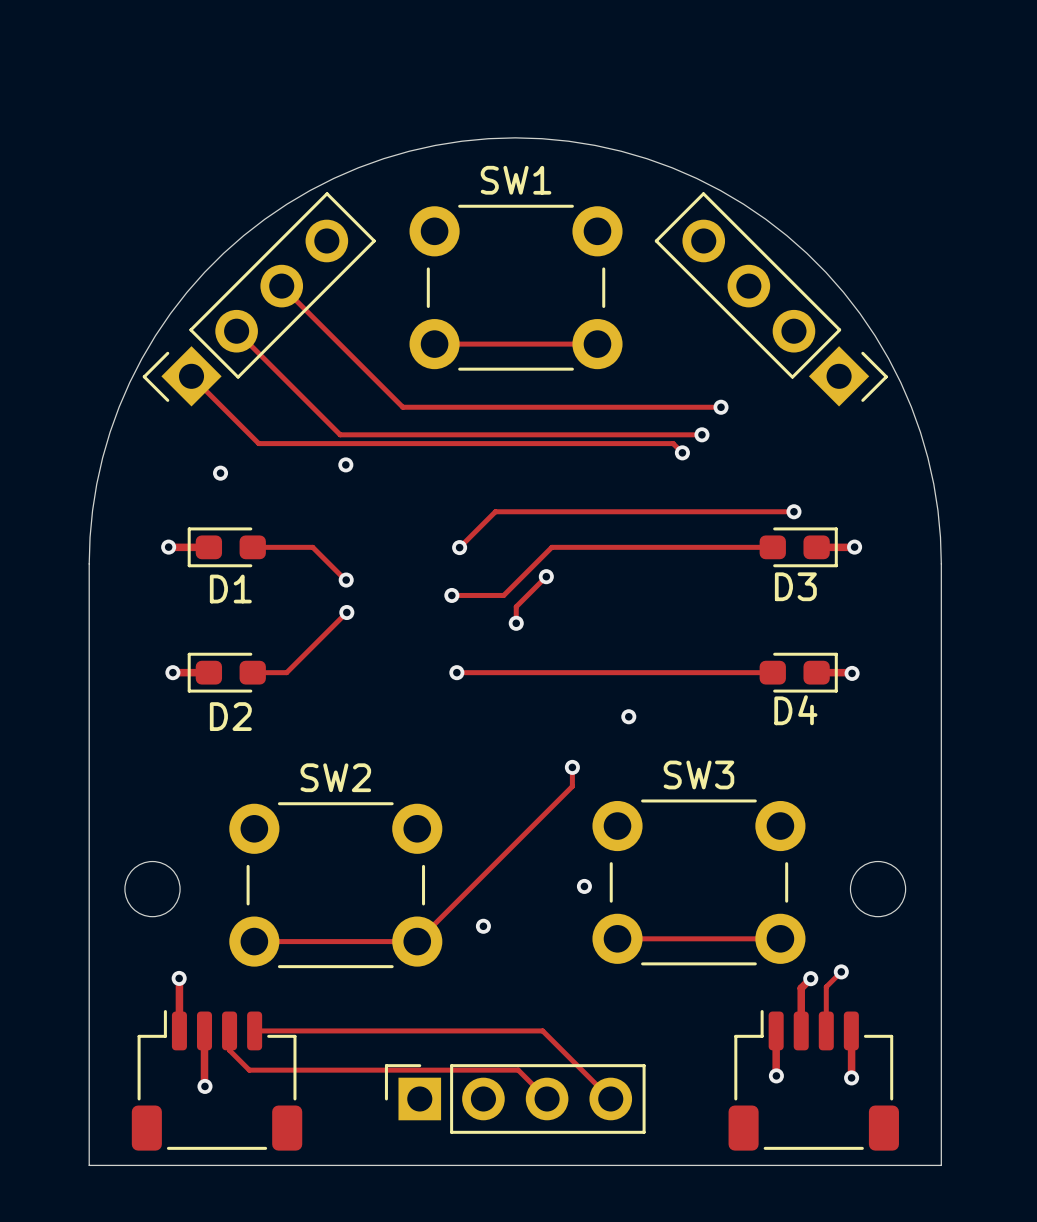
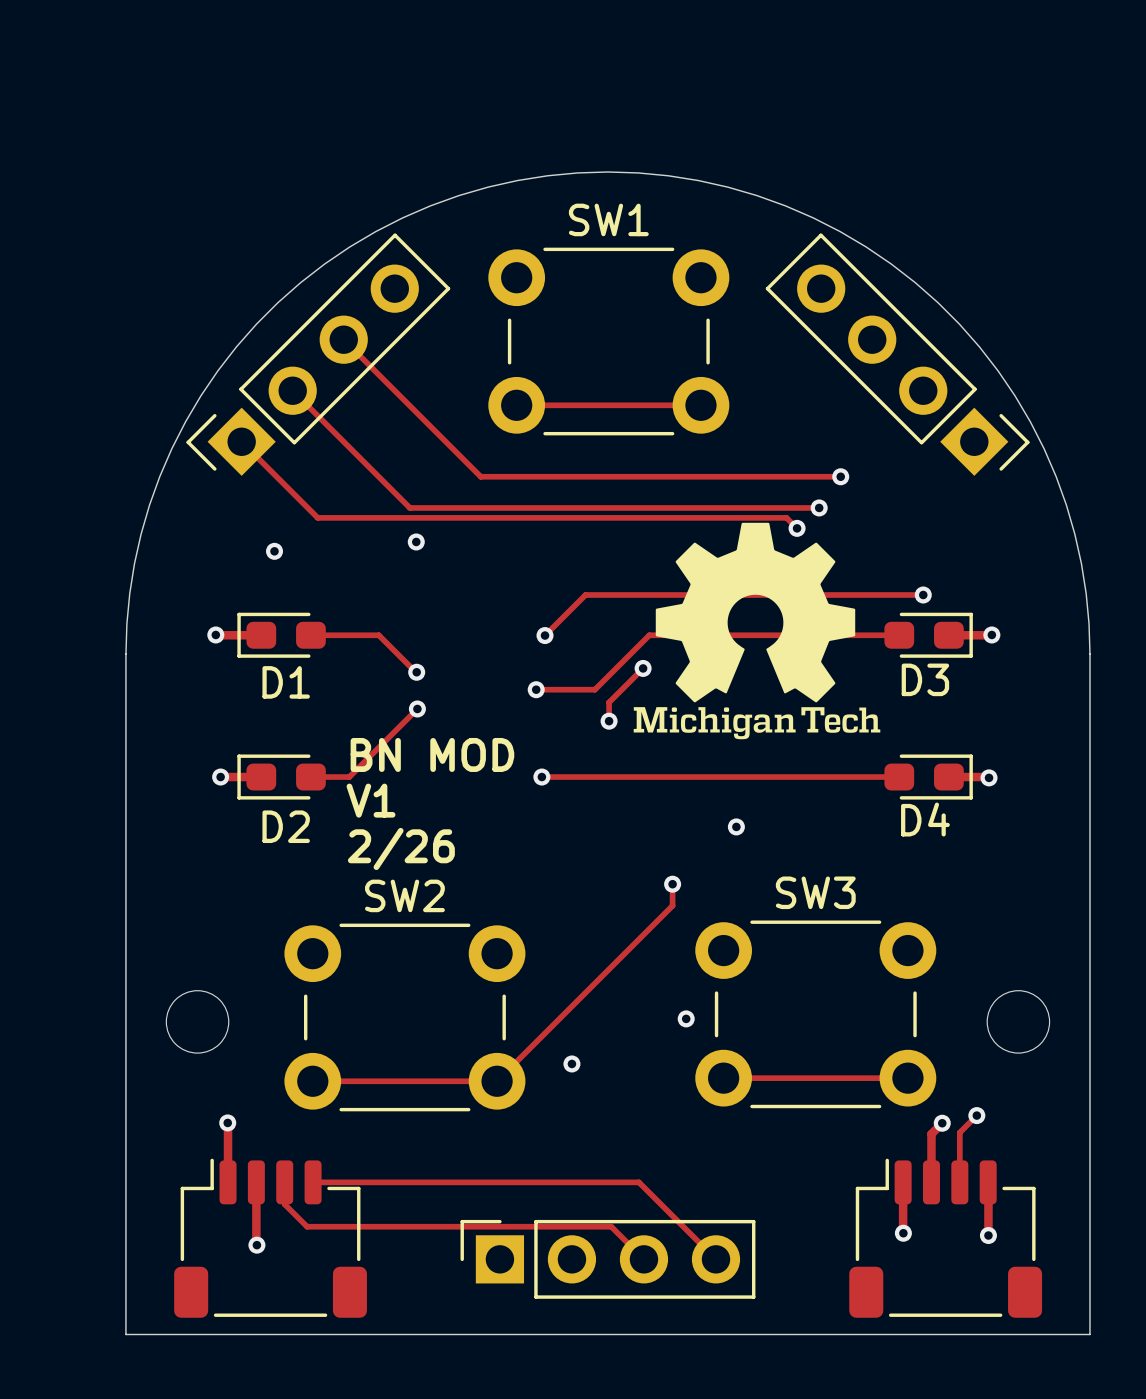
drawing: none -> [633, 522, 881, 740]
text: none -> BN MOD (432, 754)
text: none -> V1 (371, 800)
text: none -> 2/26 (401, 848)

